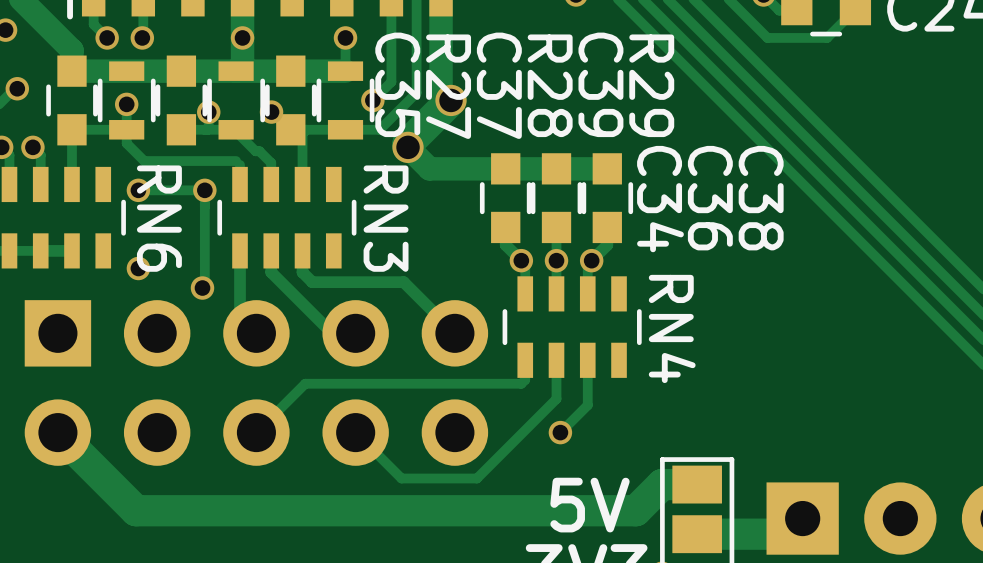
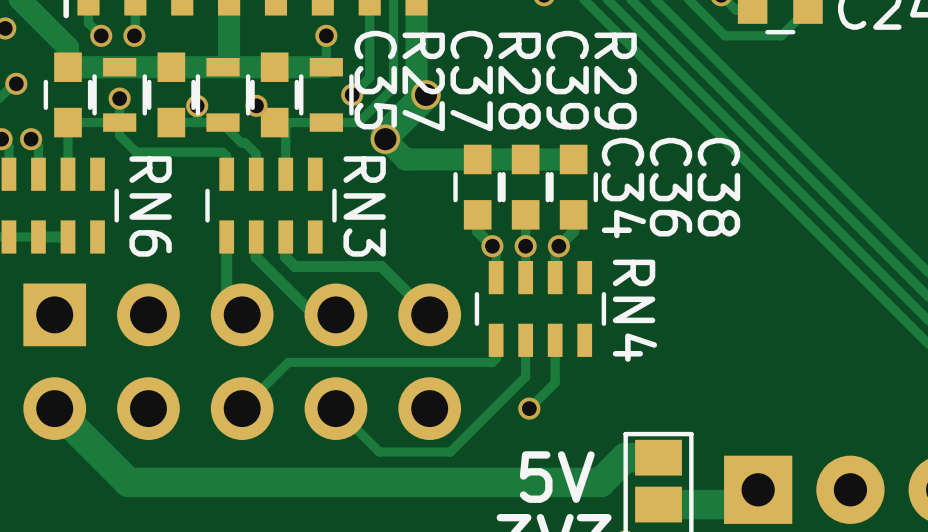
via: (242, 37) -> none
track: (138, 190) (204, 190) (204, 285) (202, 288) -> none
via: (138, 190) -> none
via: (204, 190) -> none
via: (138, 268) -> none
via: (202, 288) -> none

